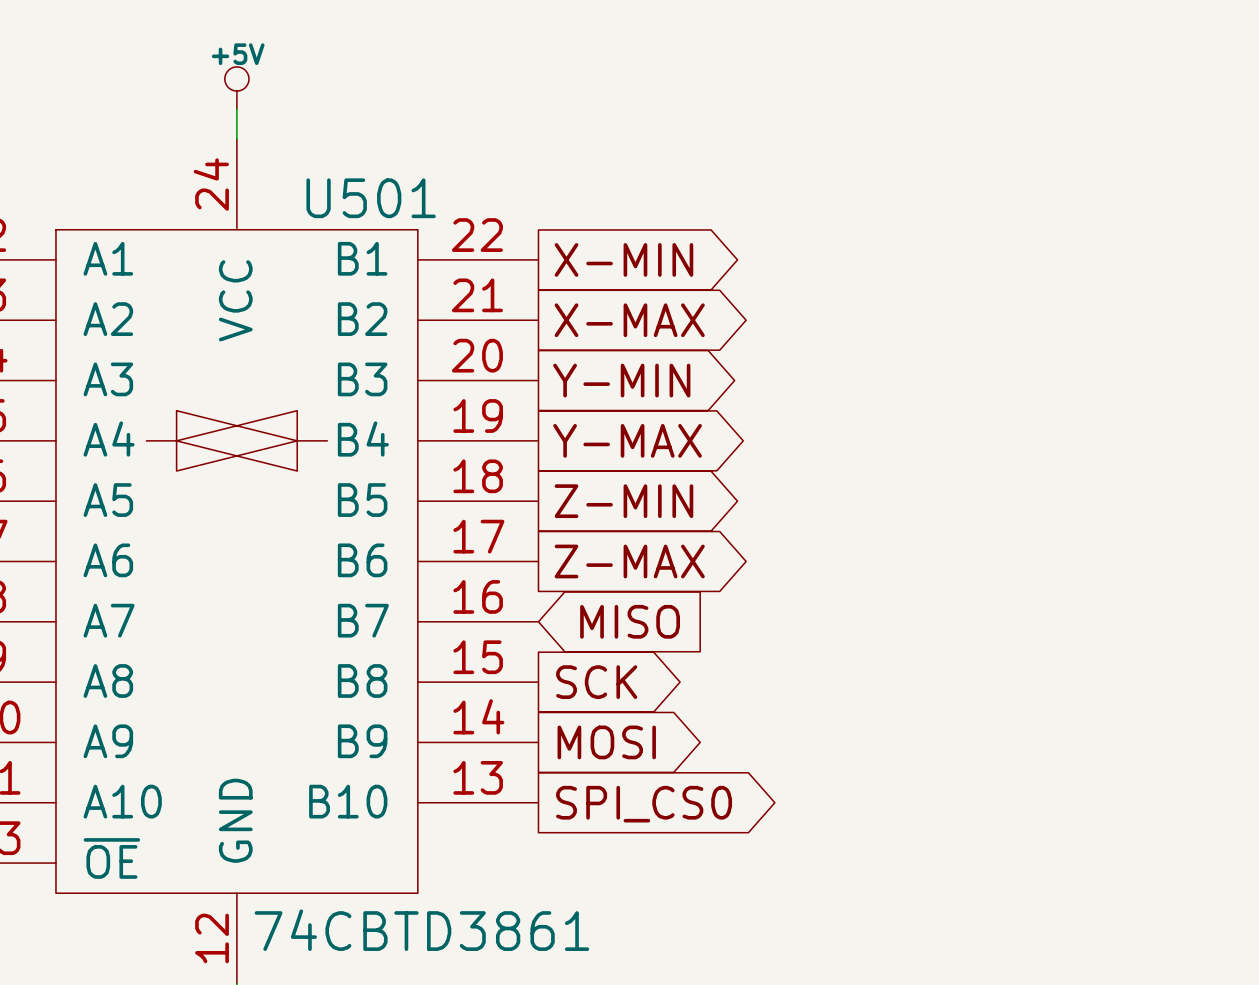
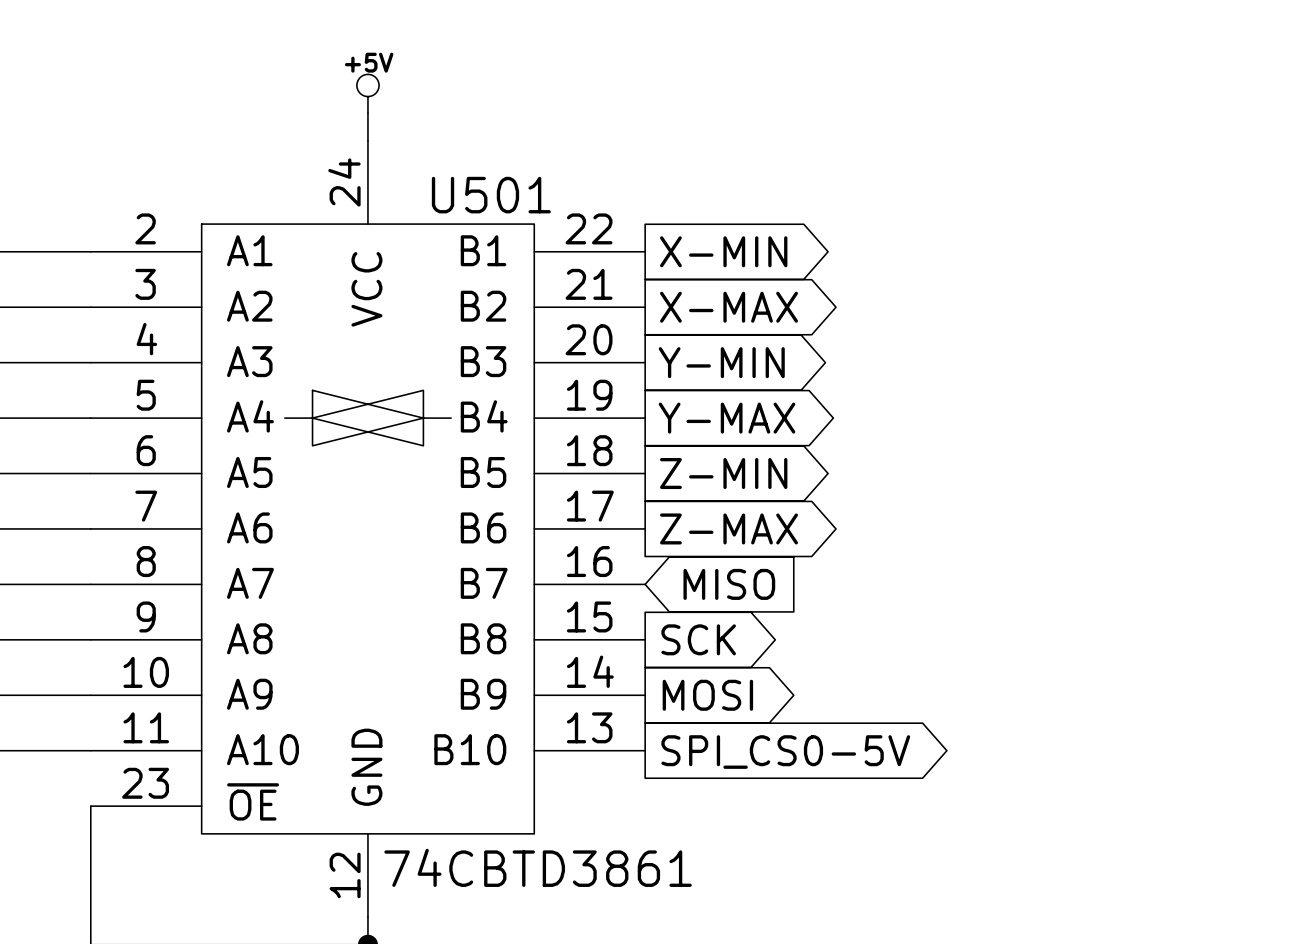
global label: SPI_CS0 (644, 804) -> SPI_CS0-5V (785, 752)

